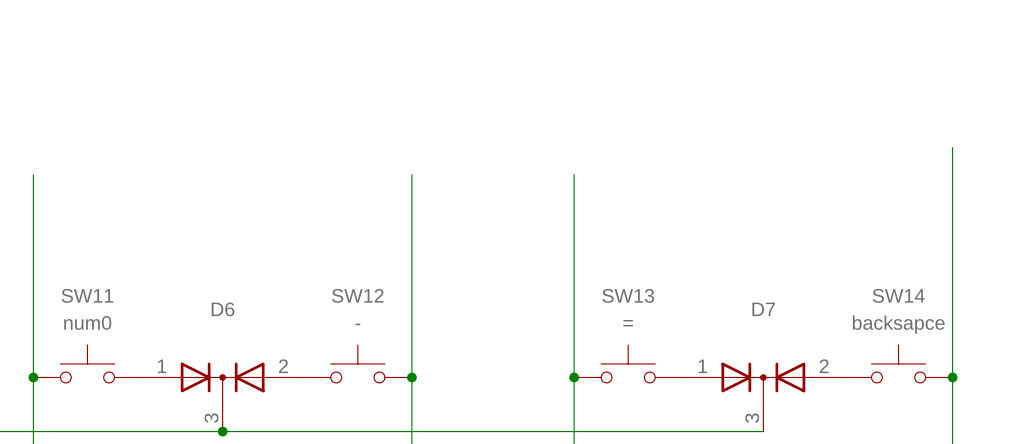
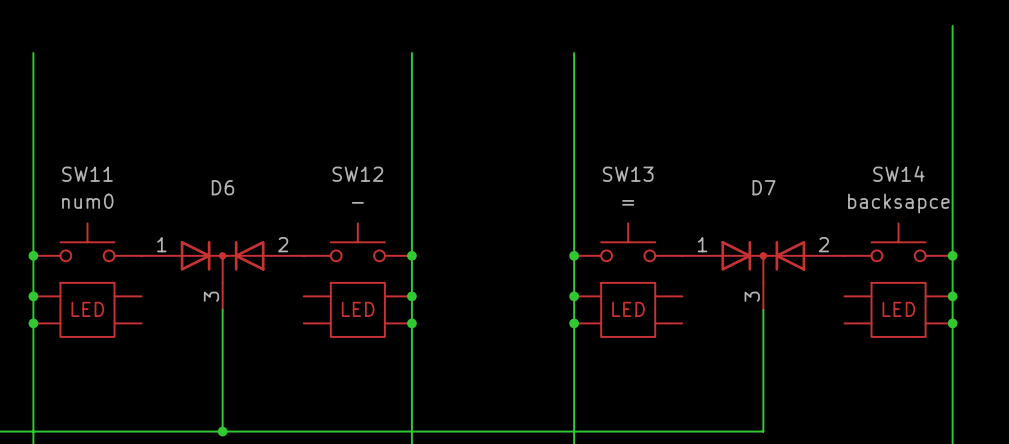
wire: none -> (952, 26) (952, 147)
wire: none -> (33, 53) (33, 174)
wire: none -> (411, 53) (411, 174)
wire: none -> (574, 53) (574, 174)
junction: none -> (33, 255)
junction: none -> (411, 255)
junction: none -> (574, 255)
junction: none -> (952, 255)
SW11 name position: SW11 (87, 295) -> SW11 (87, 174)
SW12 name position: SW12 (357, 295) -> SW12 (357, 174)
SW13 name position: SW13 (628, 295) -> SW13 (628, 174)
SW14 name position: SW14 (898, 295) -> SW14 (898, 173)
junction: none -> (33, 296)
junction: none -> (411, 296)
junction: none -> (574, 296)
junction: none -> (952, 296)
wire: none -> (222, 309) (222, 431)
wire: none -> (763, 309) (763, 431)
SW11 value position: num0 (87, 322) -> num0 (87, 201)
junction: none -> (33, 323)
junction: none -> (411, 323)
junction: none -> (574, 323)
SW13 value position: = (628, 323) -> = (628, 202)
junction: none -> (952, 323)
SW12 value position: - (357, 324) -> - (357, 202)
SW14 value position: backsapce (898, 324) -> backsapce (898, 203)
SW11 symbol: [33, 345, 142, 383] -> [33, 223, 142, 337]
SW12 symbol: [303, 345, 412, 383] -> [303, 223, 412, 337]
SW13 symbol: [574, 345, 683, 383] -> [574, 223, 683, 337]
SW14 symbol: [844, 345, 953, 383] -> [844, 223, 953, 337]
junction: (33, 377) -> none
junction: (411, 377) -> none
junction: (574, 377) -> none
junction: (952, 377) -> none
D6 position: (222, 397) -> (222, 275)
D7 position: (763, 397) -> (763, 275)

